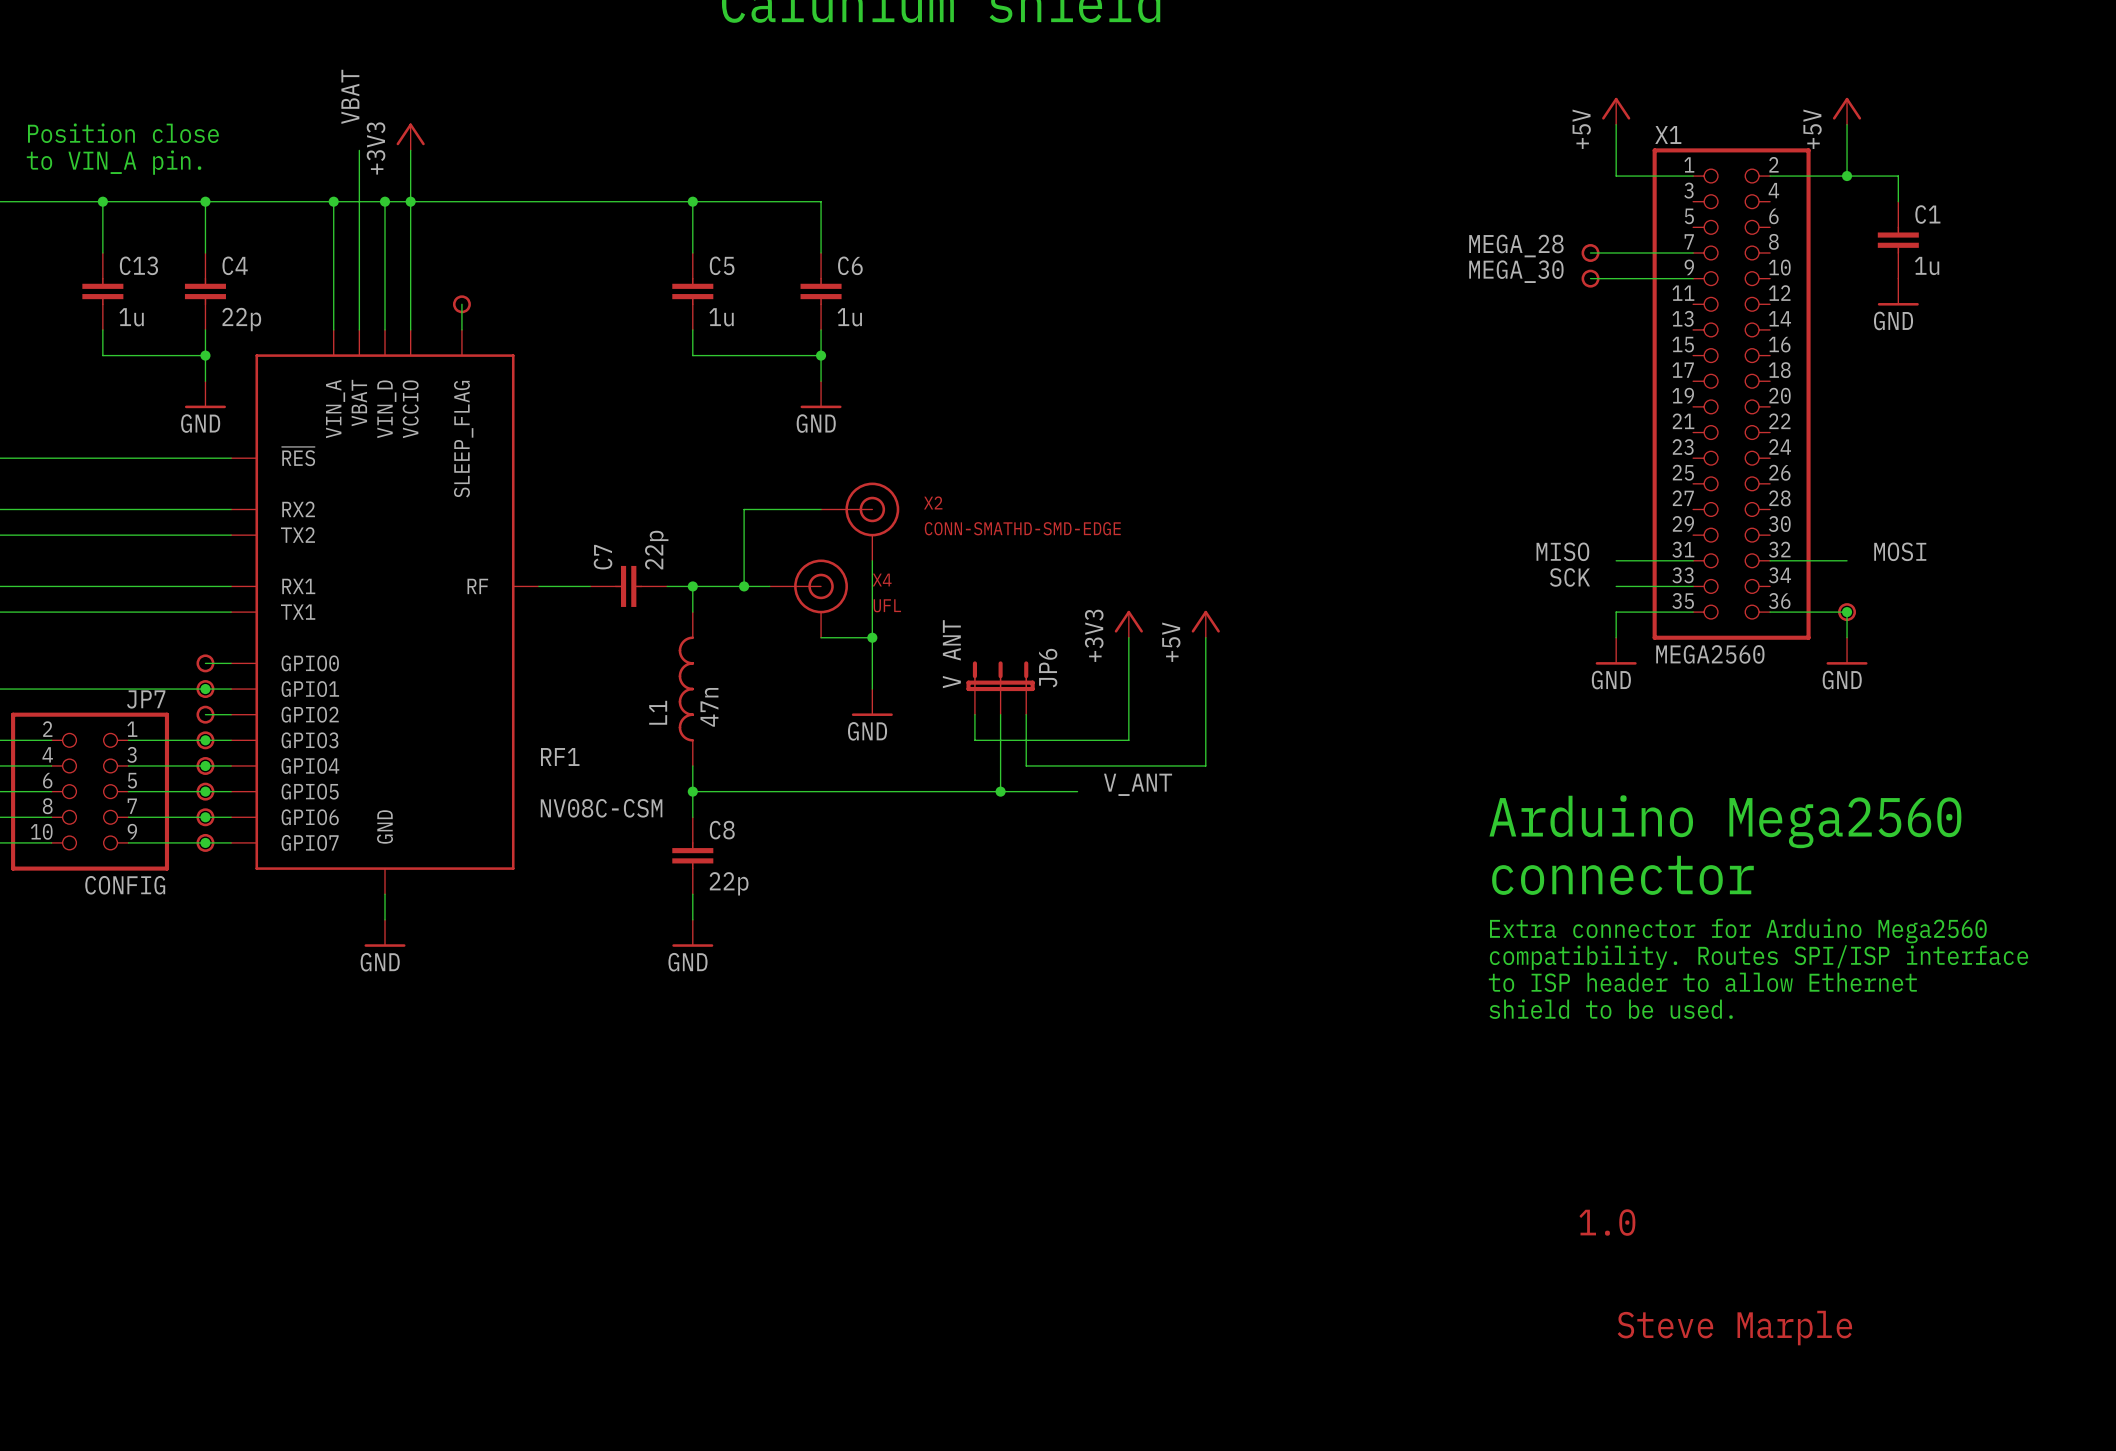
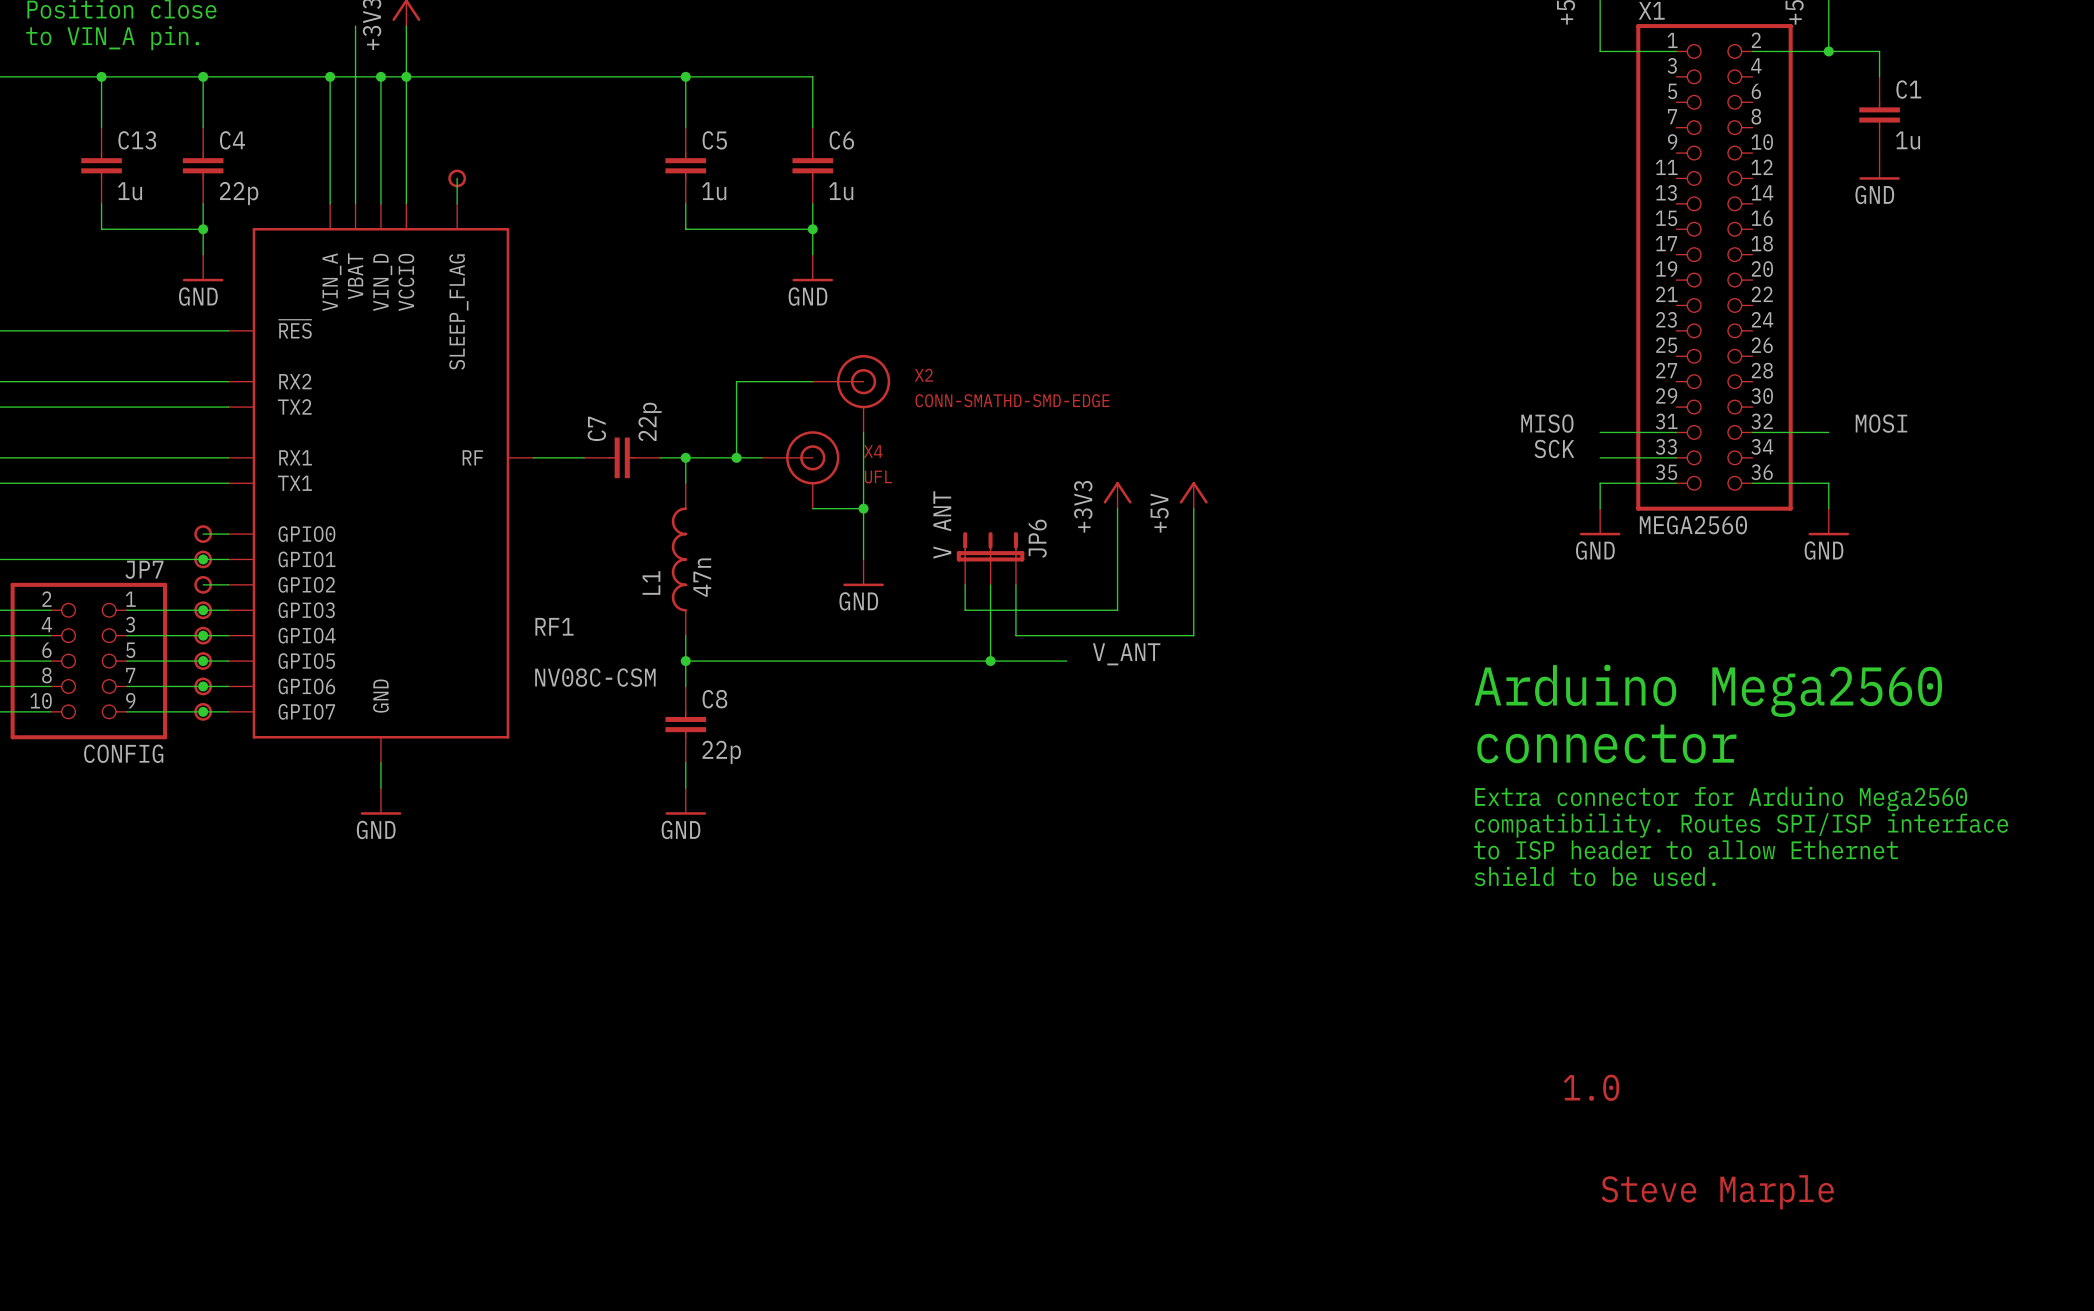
label: MEGA_28 (1516, 246) -> none
wire: (1590, 252) (1693, 252) -> none
part: (1590, 252) -> none
label: MEGA_30 (1516, 271) -> none
wire: (1590, 278) (1693, 278) -> none
part: (1590, 278) -> none
part: (1847, 612) -> none
junction: (1847, 612) -> none

